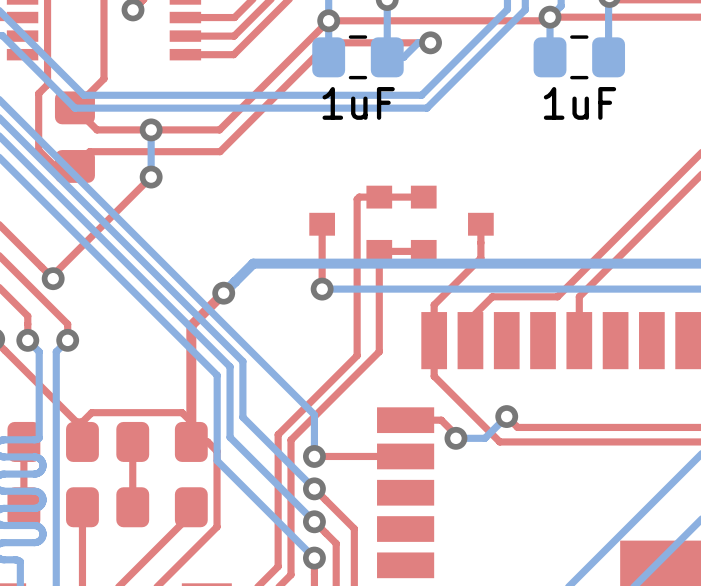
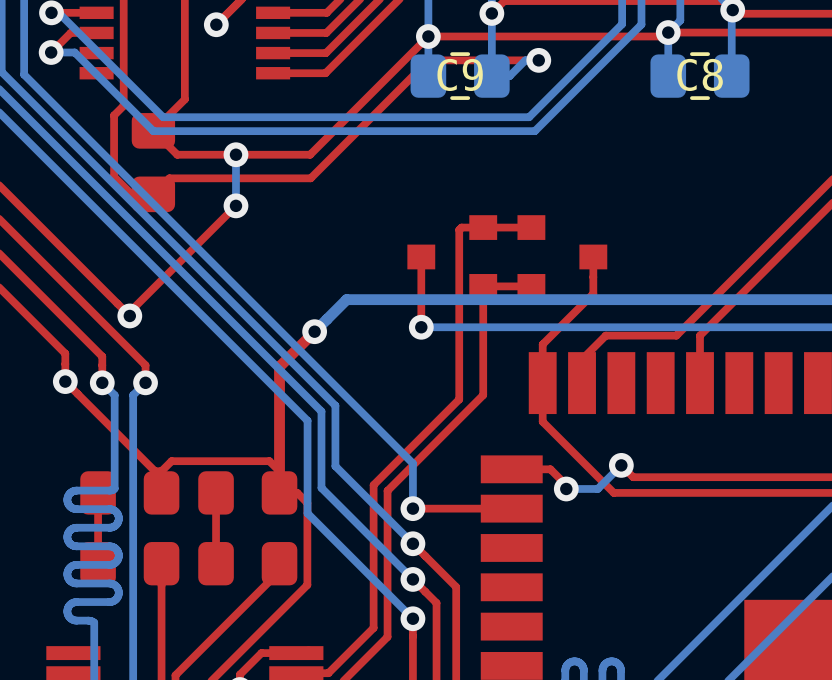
1uF name: 1uF (358, 103) -> C9 (460, 74)
1uF name: 1uF (579, 103) -> C8 (700, 74)

